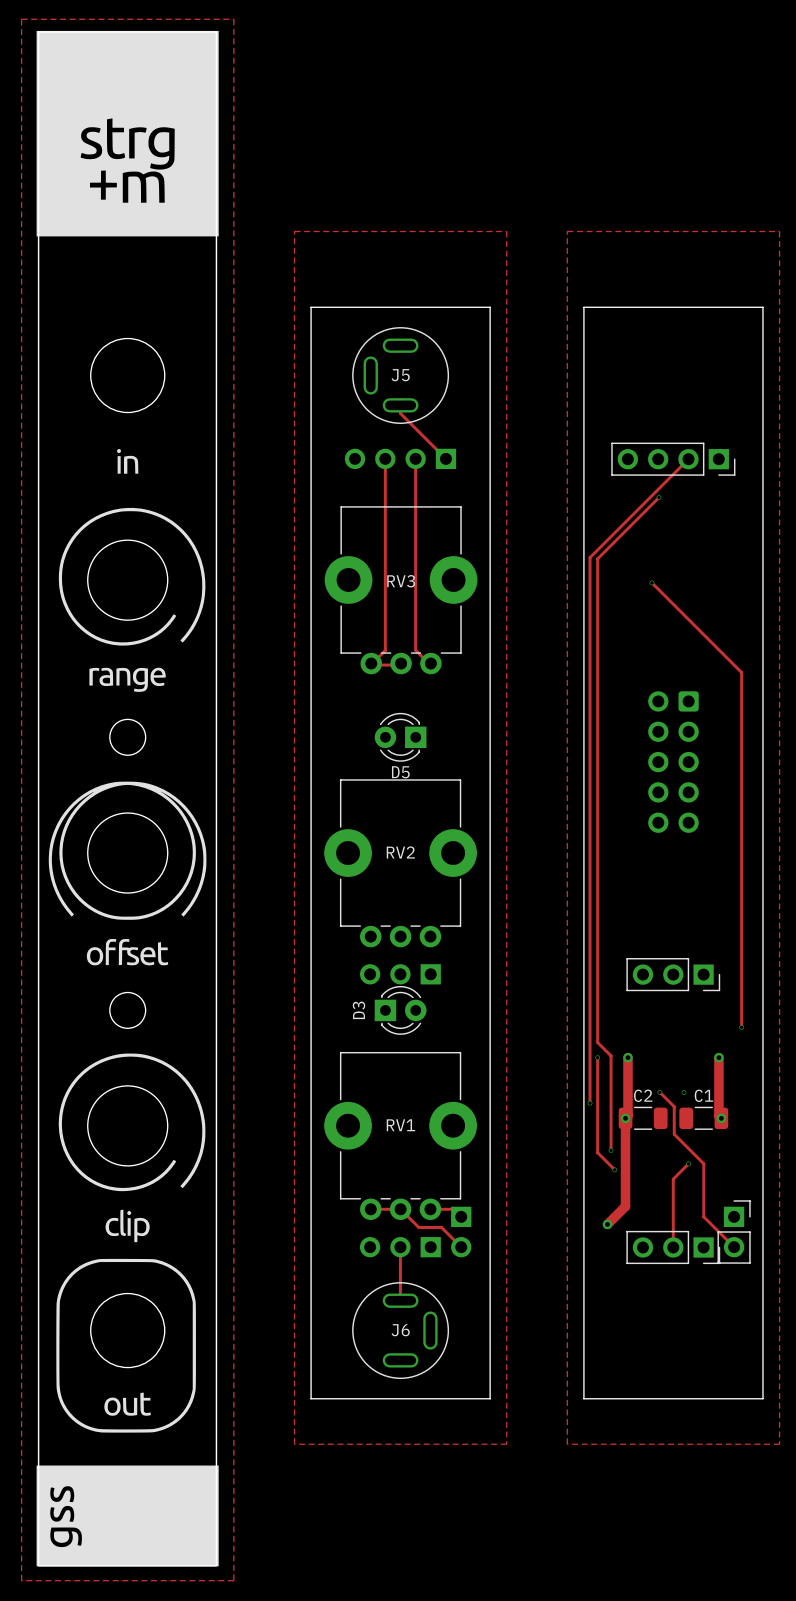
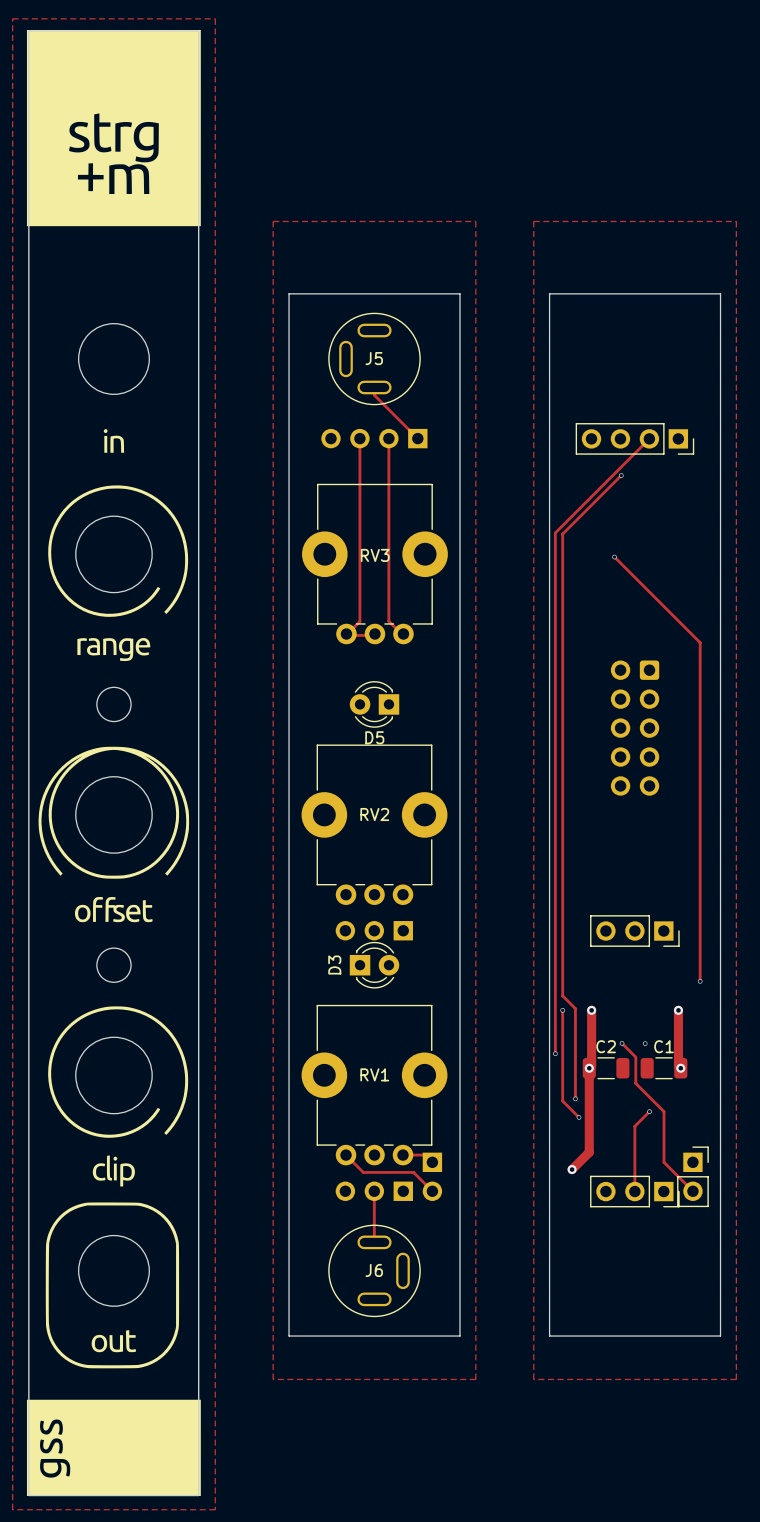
track: (370, 1209) (400, 1209) (418, 1227) -> (346, 1155) (363, 1172) (391, 1172)

